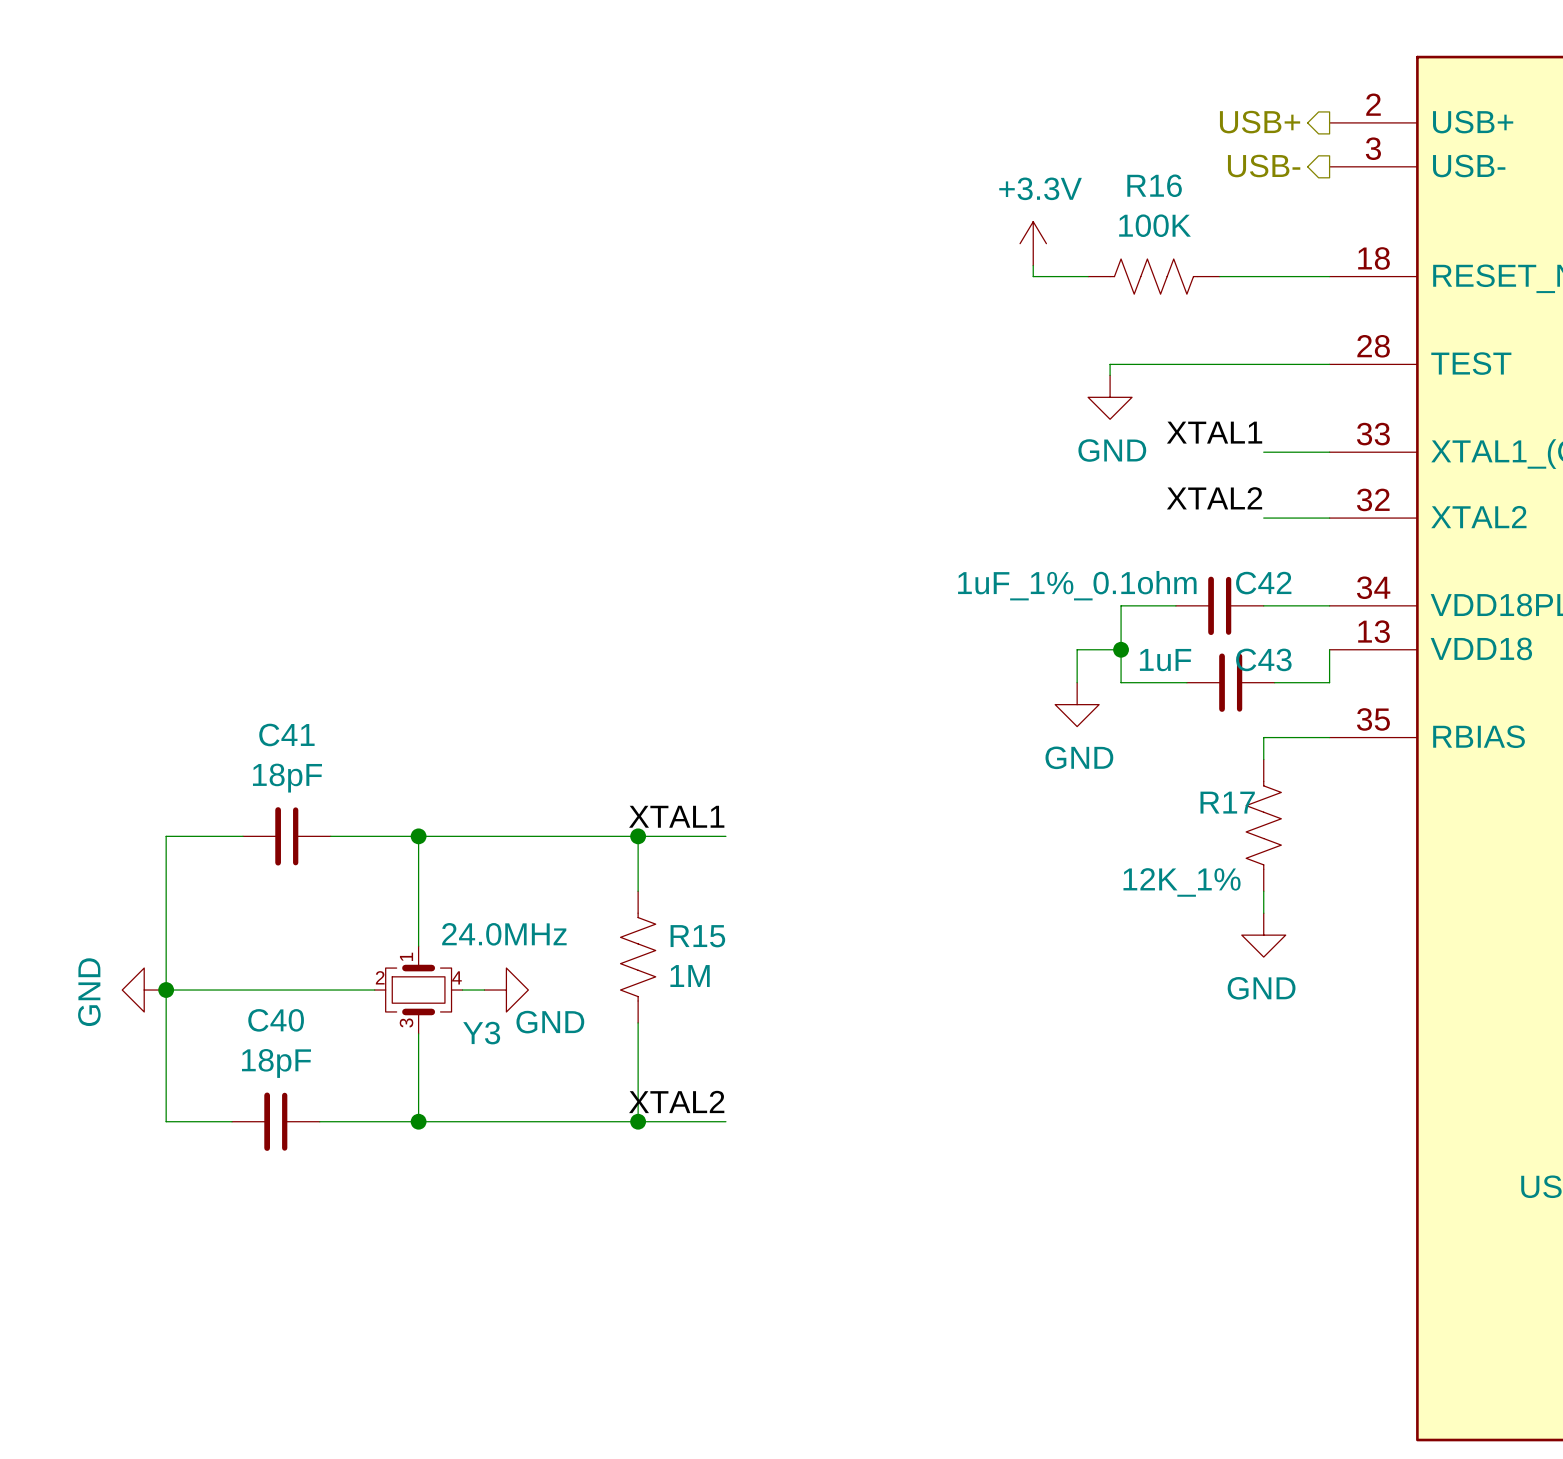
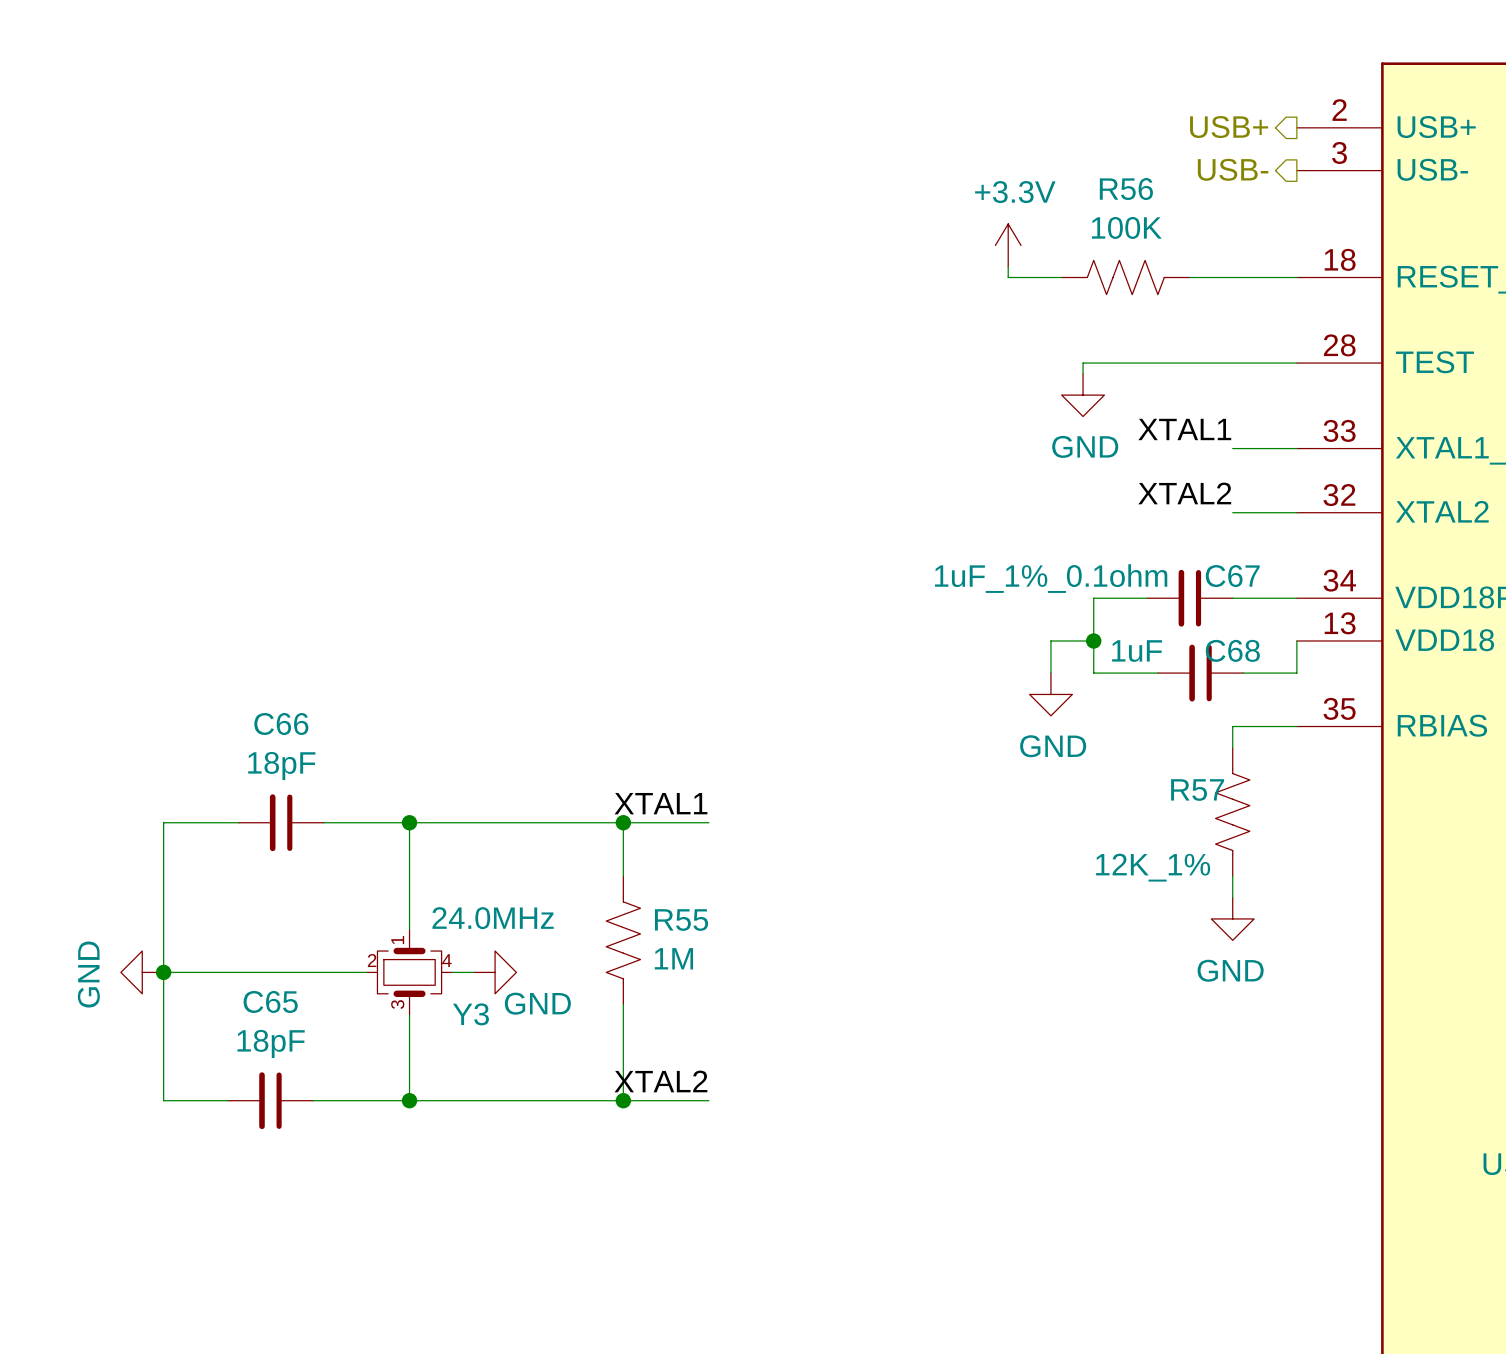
R16 name: R16 (1154, 185) -> R56 (1126, 189)
C42 name: C42 (1263, 583) -> C67 (1232, 576)
C43 name: C43 (1263, 659) -> C68 (1232, 650)
C41 name: C41 (286, 734) -> C66 (281, 724)
R17 name: R17 (1227, 802) -> R57 (1197, 790)
R15 name: R15 (697, 936) -> R55 (681, 920)
C40 name: C40 (276, 1020) -> C65 (270, 1001)

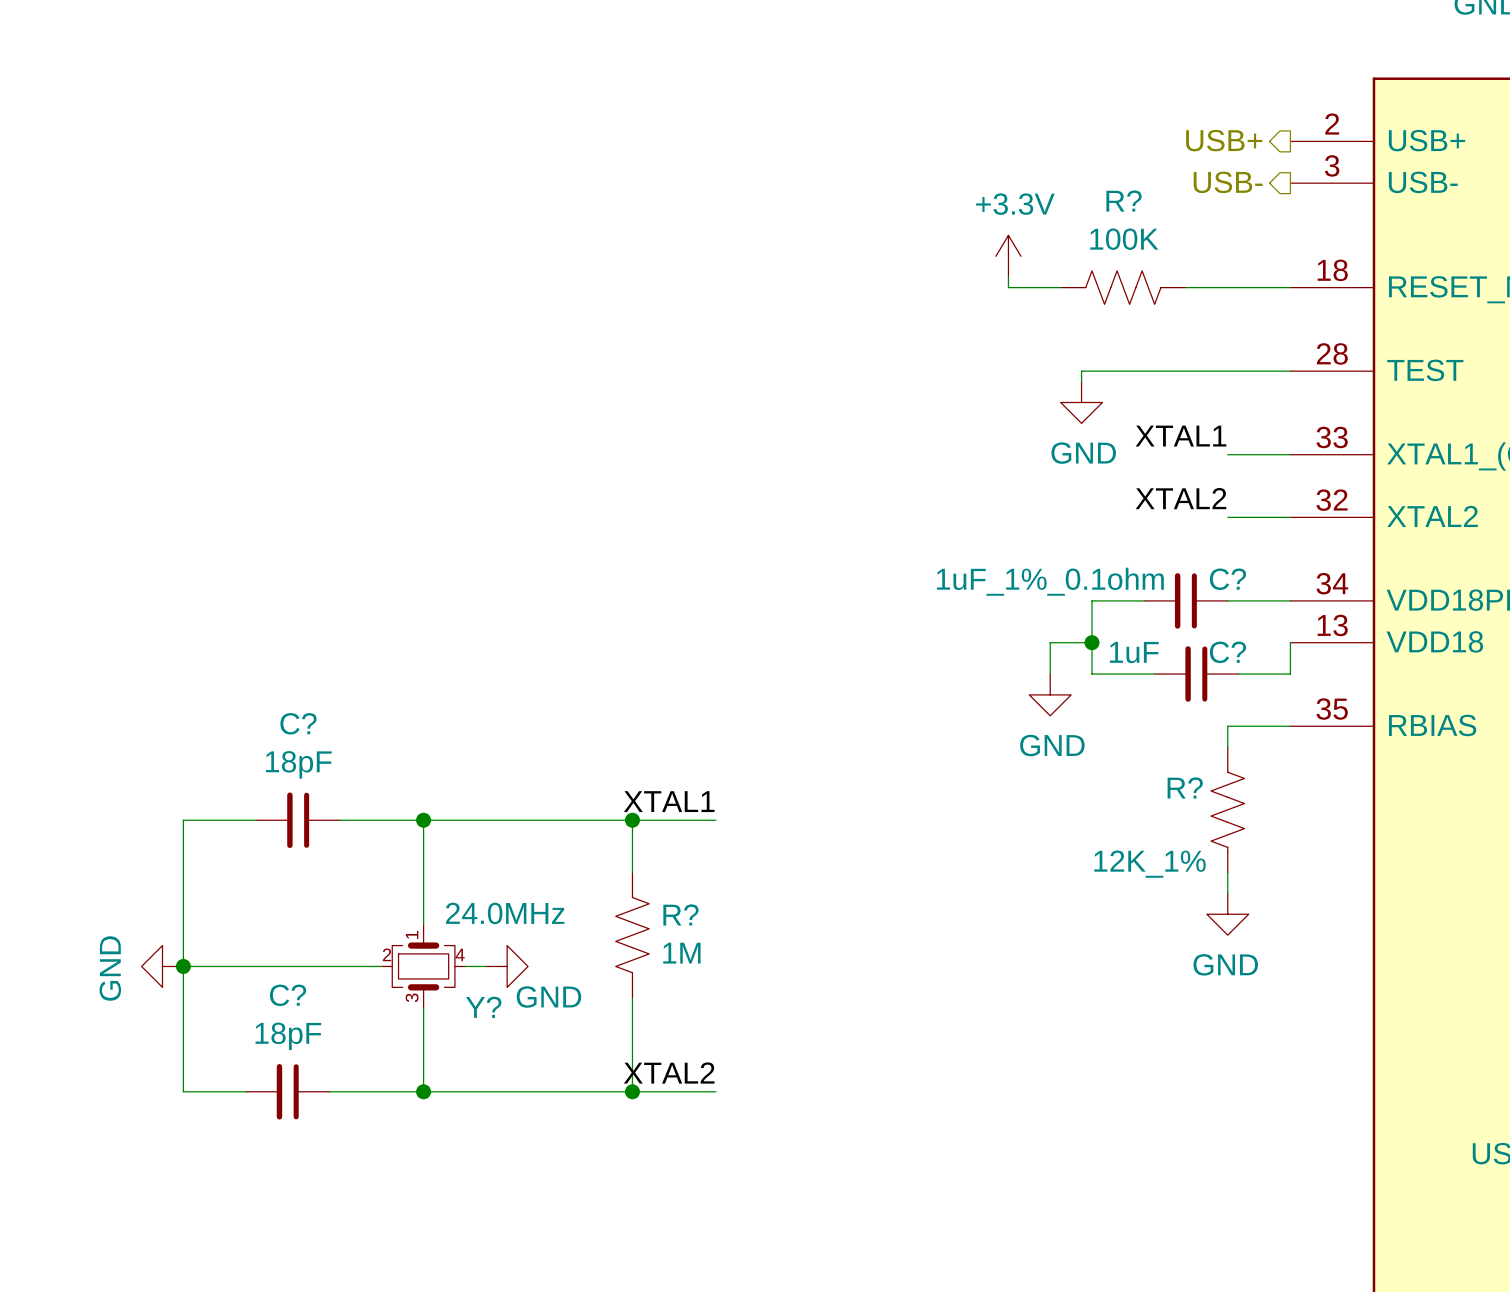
R56 name: R56 (1126, 189) -> R? (1124, 201)
C67 name: C67 (1232, 576) -> C? (1227, 579)
C68 name: C68 (1232, 650) -> C? (1227, 652)
C66 name: C66 (281, 724) -> C? (298, 723)
R57 name: R57 (1197, 790) -> R? (1185, 787)
R55 name: R55 (681, 920) -> R? (680, 914)
C65 name: C65 (270, 1001) -> C? (288, 995)
Y3 name: Y3 (470, 1014) -> Y? (483, 1007)

